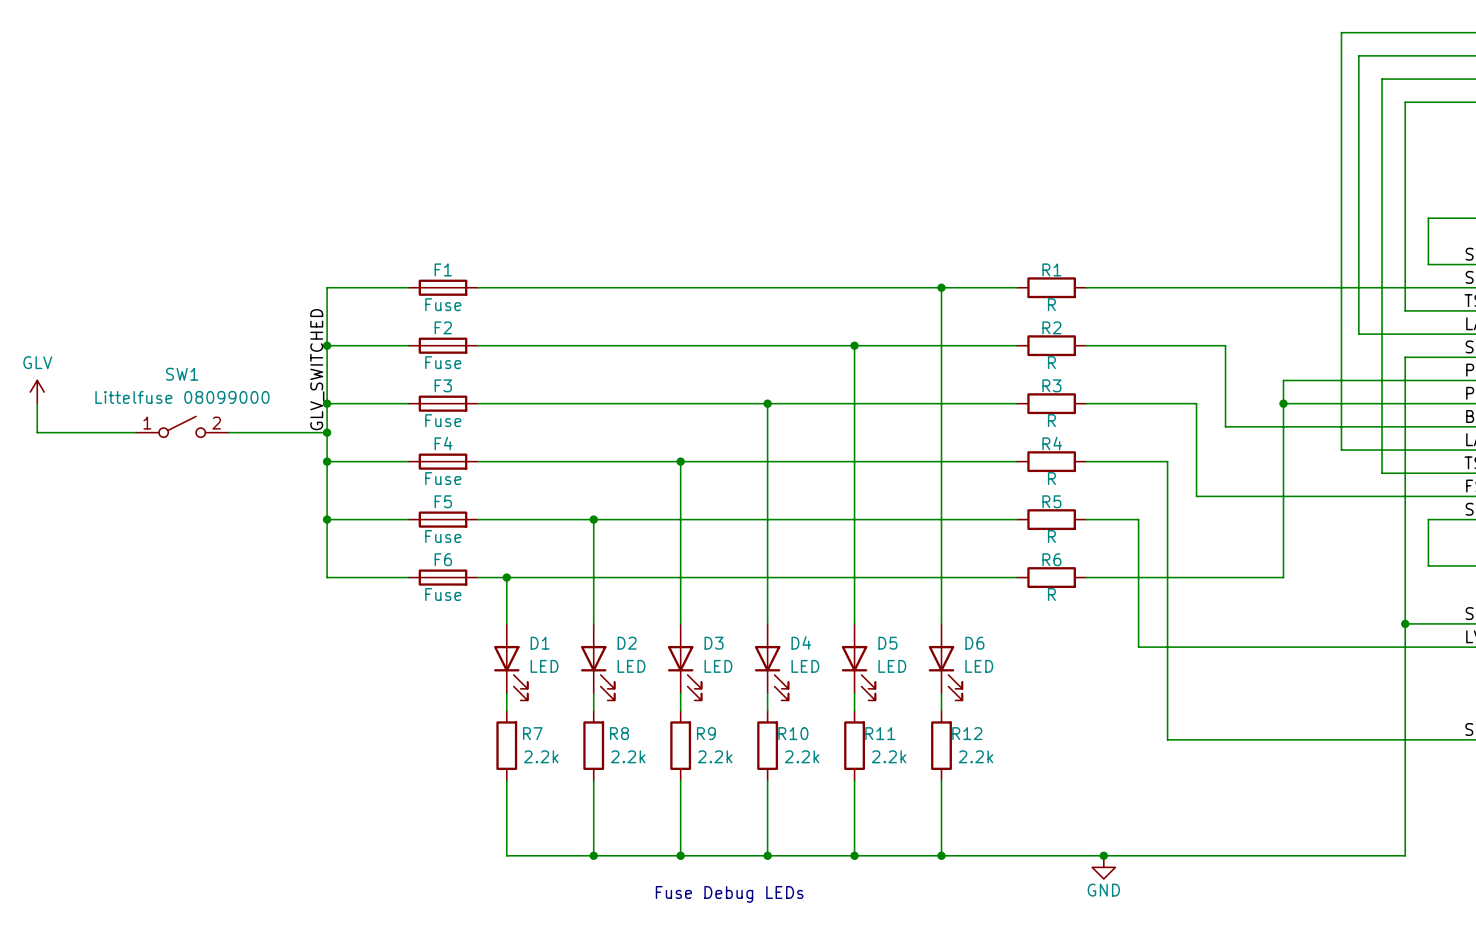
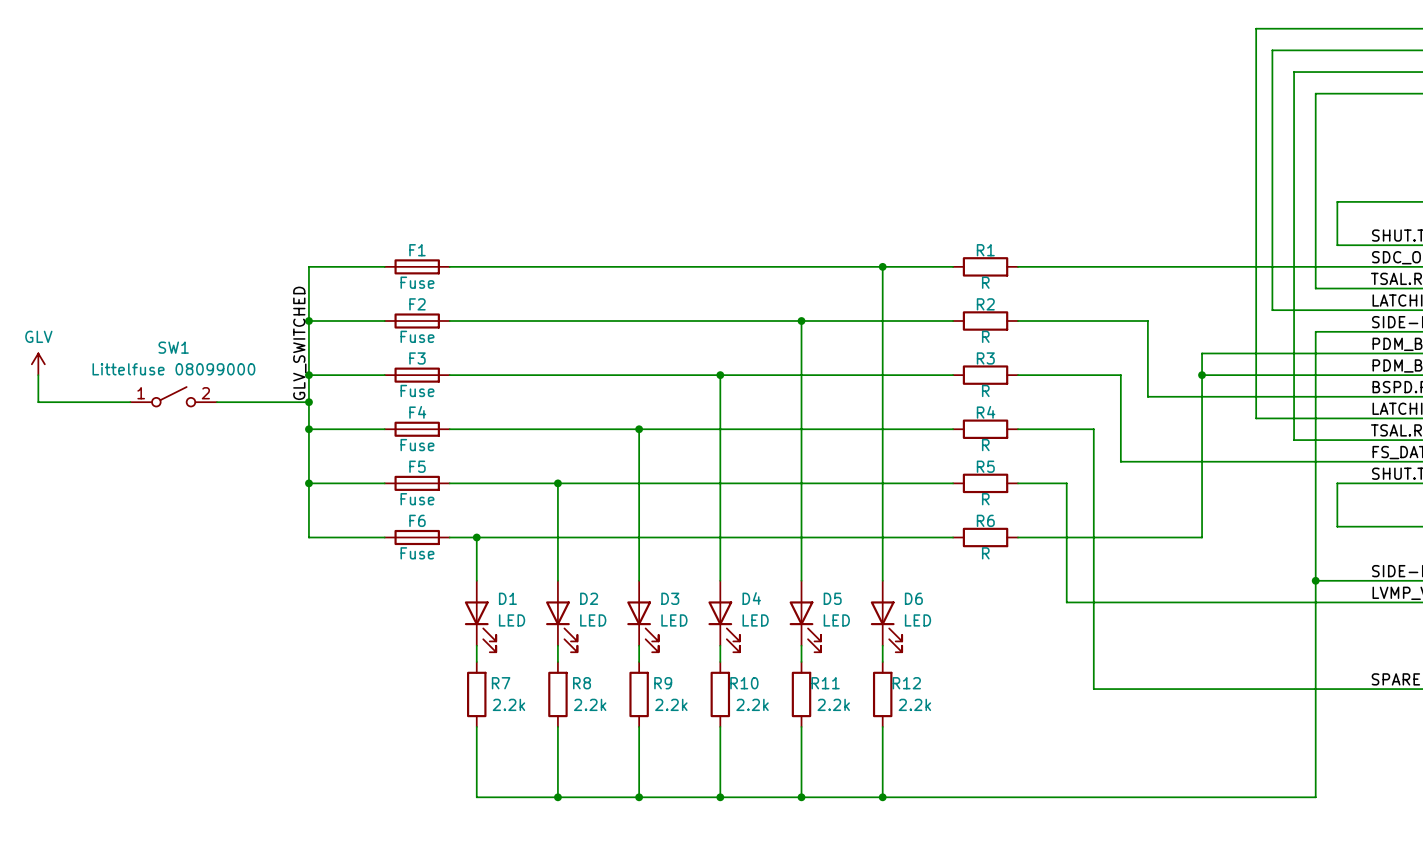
junction: (1103, 855) -> none
power symbol: GND (1103, 867) -> none
text: Fuse Debug LEDs (729, 894) -> none

